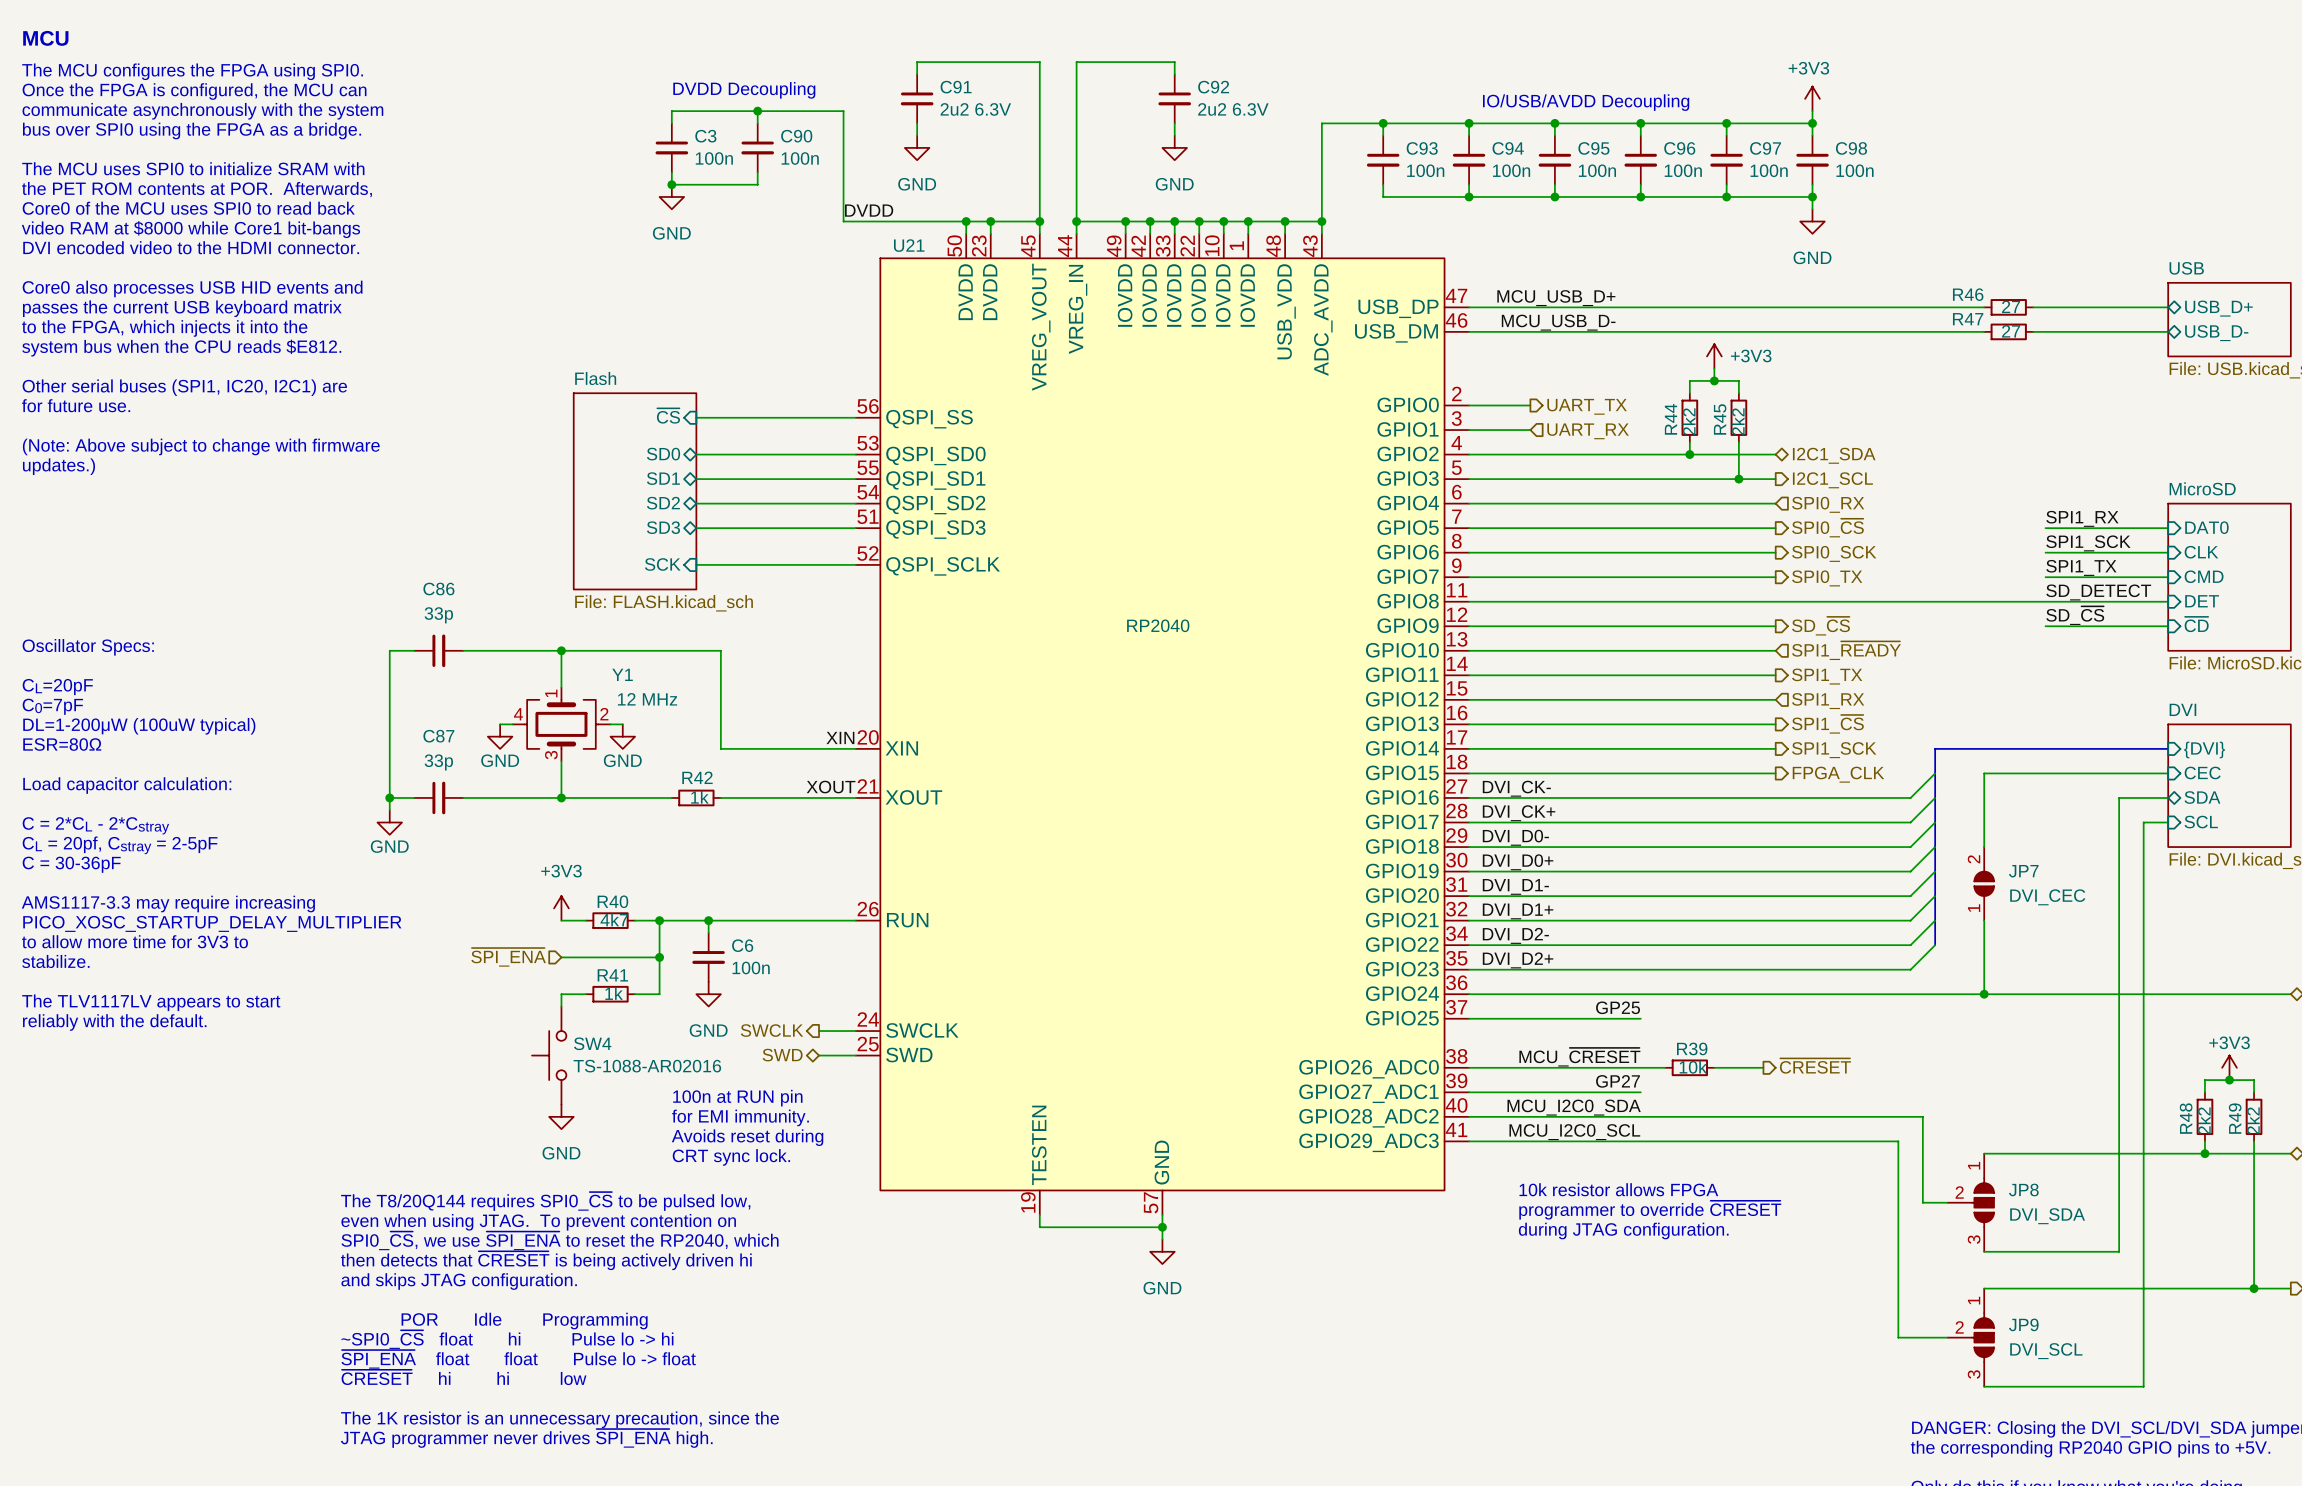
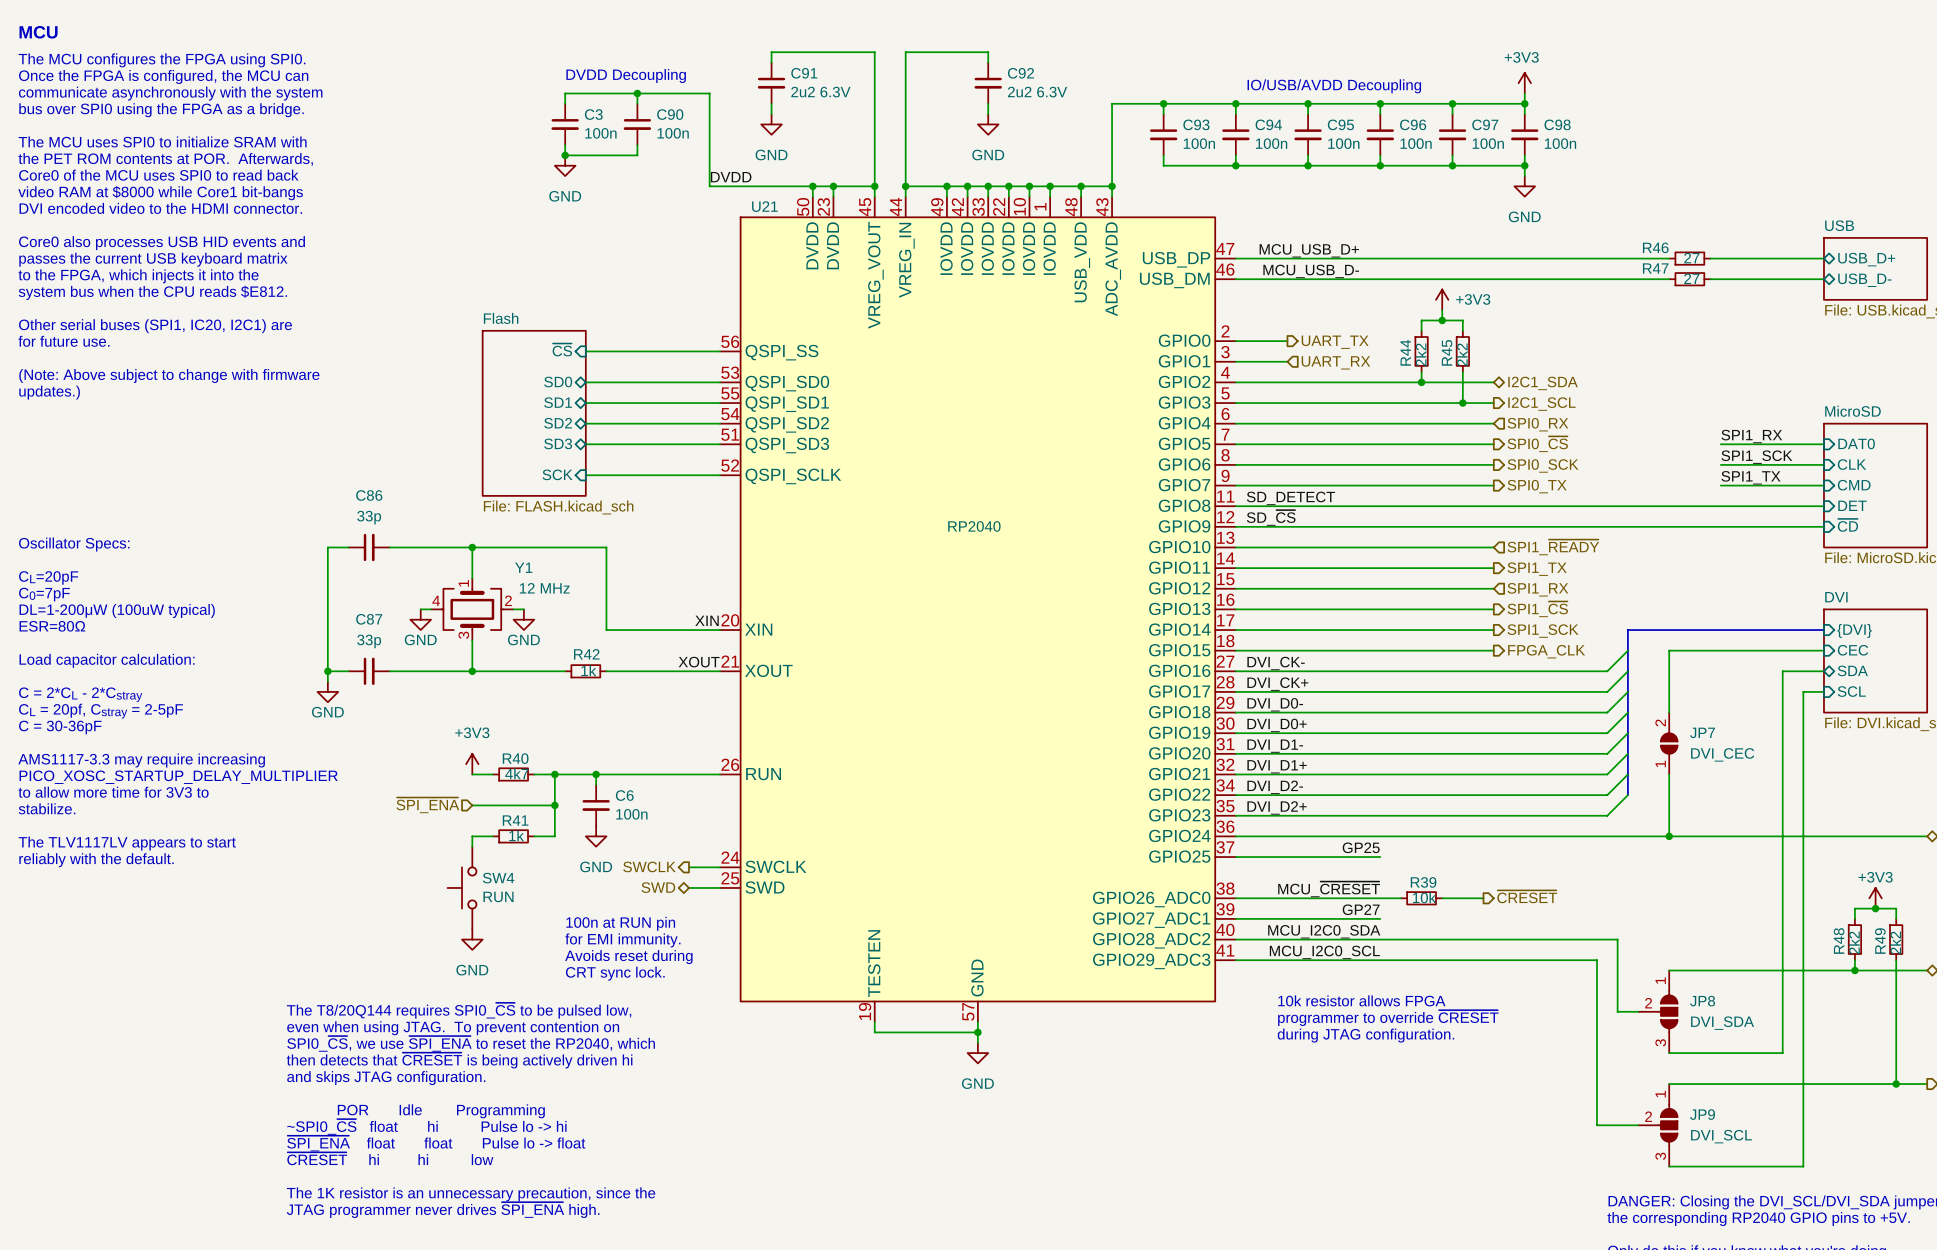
label: none -> SD_DETECT (1290, 498)
label: SD_DETECT (2098, 592) -> none
label: none -> SD_~{CS} (1271, 517)
label: SD_~{CS} (2075, 615) -> none
wire: none -> (1493, 526) (1720, 526)
hierarchical label: SD_~{CS} (1820, 626) -> none
SW4 value: TS-1088-AR02016 (647, 1066) -> RUN (498, 896)

